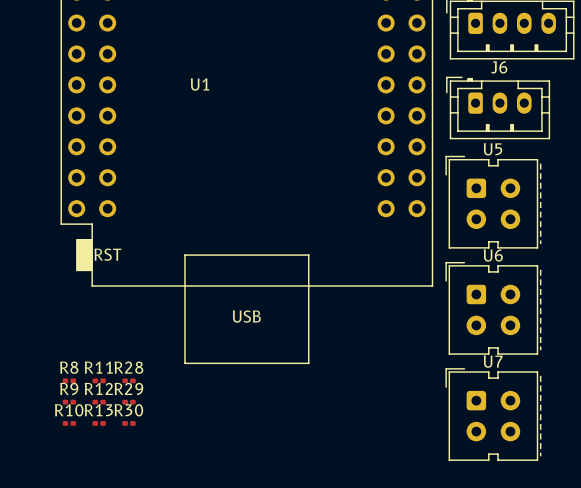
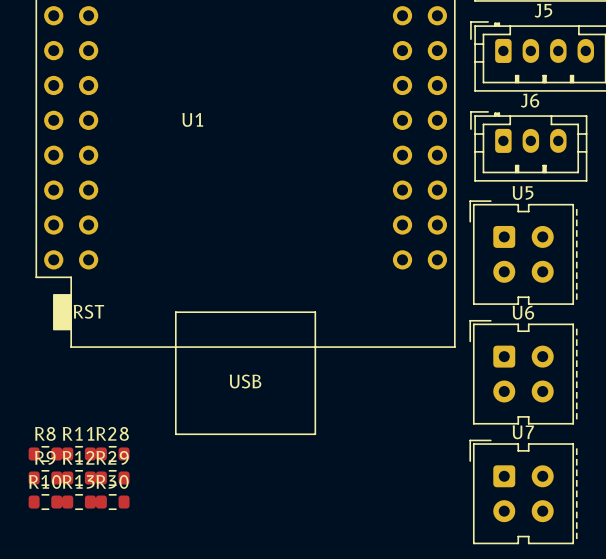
R8 footprint: [62, 378, 77, 384] -> [28, 445, 63, 462]
R11 footprint: [92, 378, 106, 384] -> [62, 445, 96, 462]
R28 footprint: [122, 378, 136, 384] -> [95, 445, 130, 462]
R9 footprint: [62, 399, 77, 405] -> [28, 470, 63, 487]
R12 footprint: [92, 399, 106, 405] -> [62, 470, 96, 487]
R29 footprint: [122, 399, 136, 405] -> [95, 470, 130, 487]
R10 footprint: [62, 421, 77, 426] -> [28, 494, 63, 511]
R13 footprint: [92, 421, 106, 426] -> [62, 494, 96, 511]
R30 footprint: [122, 421, 136, 426] -> [95, 494, 130, 511]

